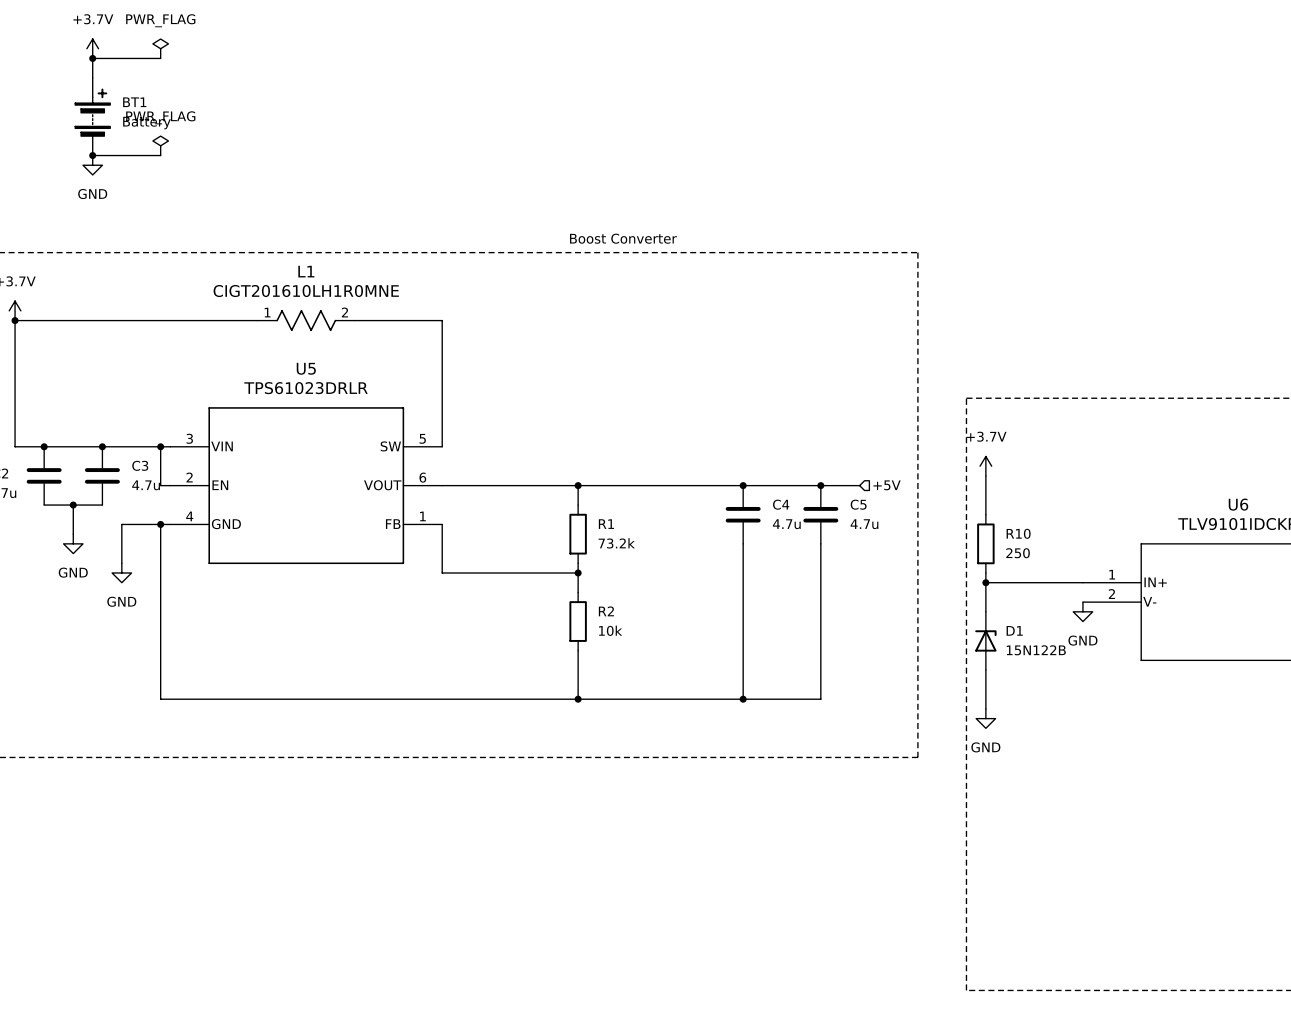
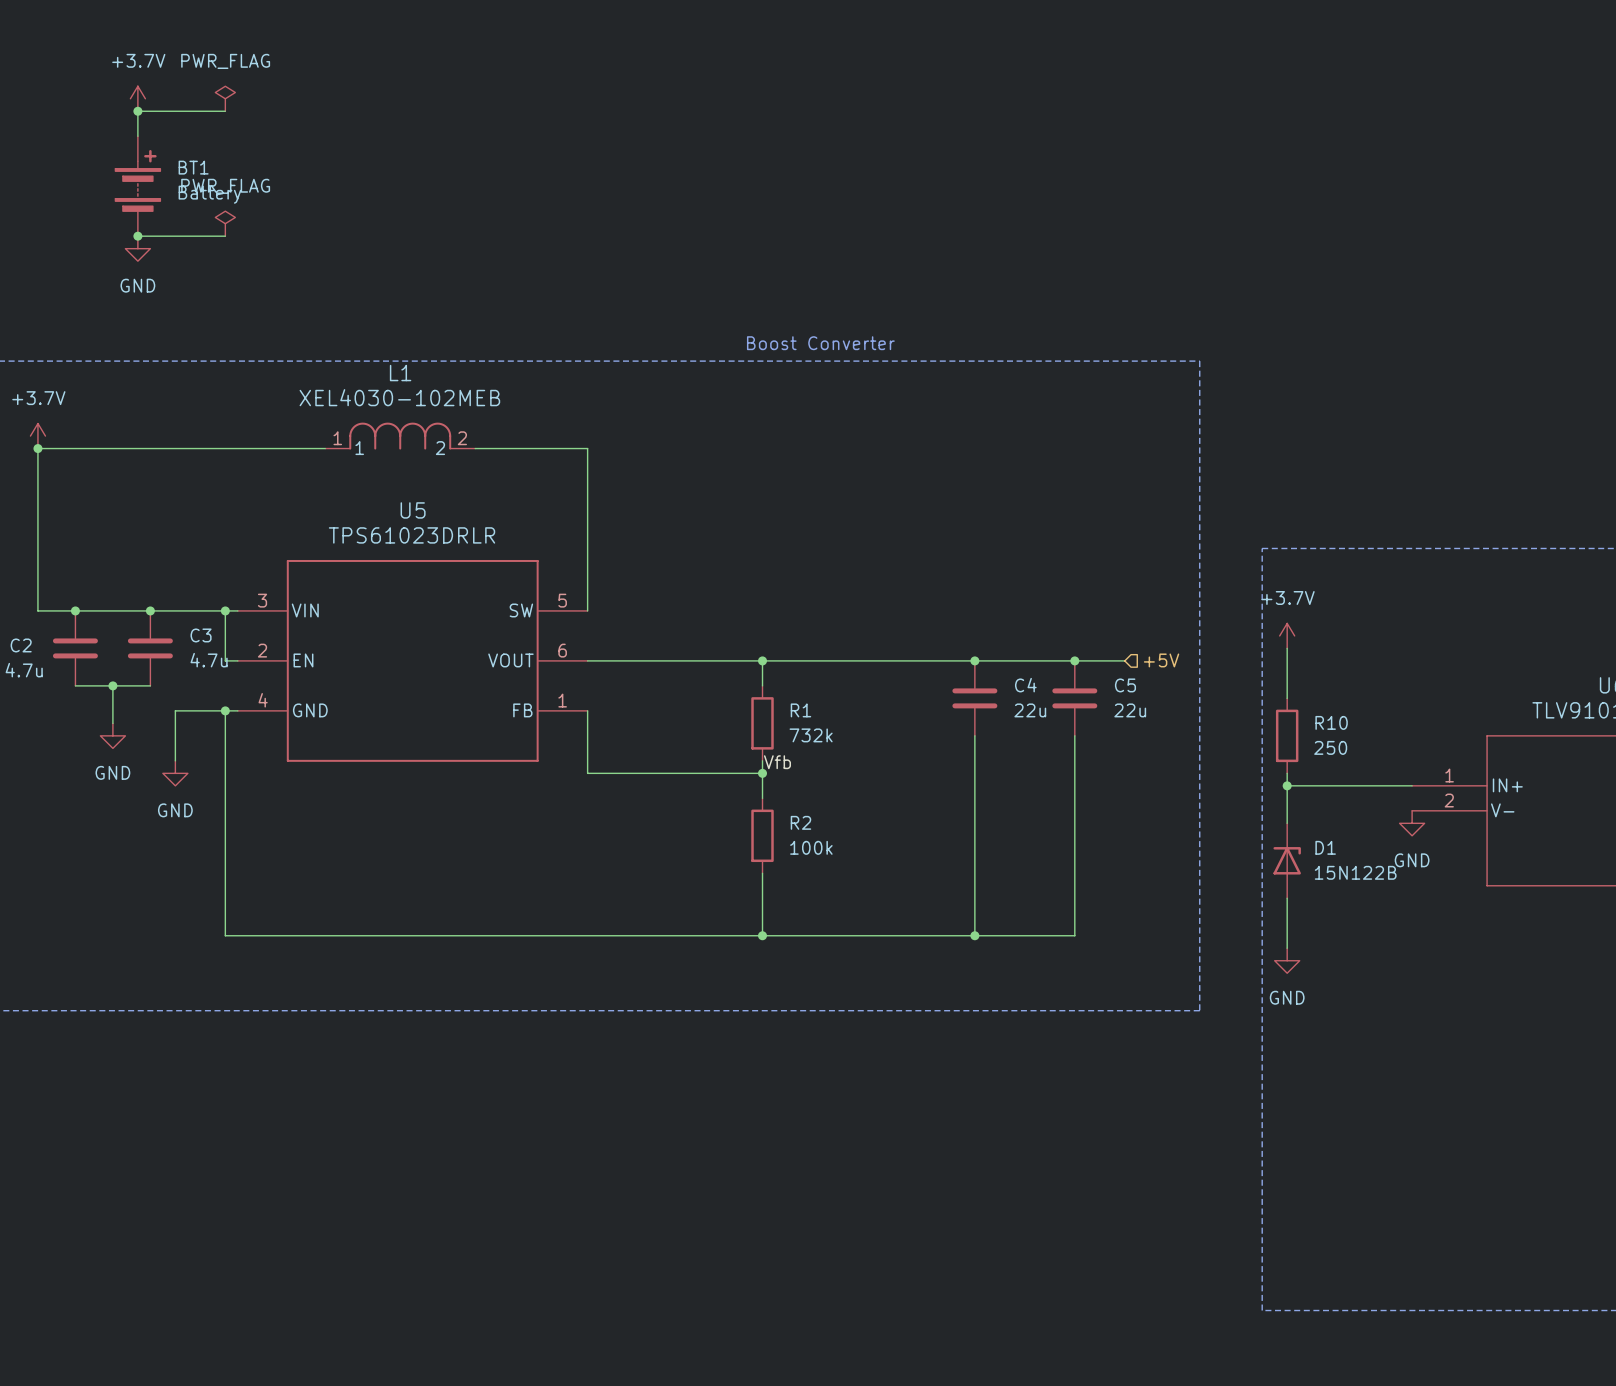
L1 value: CIGT201610LH1R0MNE (306, 291) -> XEL4030-102MEB (399, 397)
L1 symbol: [257, 310, 355, 332] -> [325, 422, 476, 450]
C4 value: 4.7u (786, 524) -> 22u (1030, 710)
C5 value: 4.7u (864, 524) -> 22u (1130, 710)
R1 value: 73.2k (616, 543) -> 732k (811, 735)
label: none -> Vfb (777, 762)
R2 value: 10k (610, 630) -> 100k (811, 847)

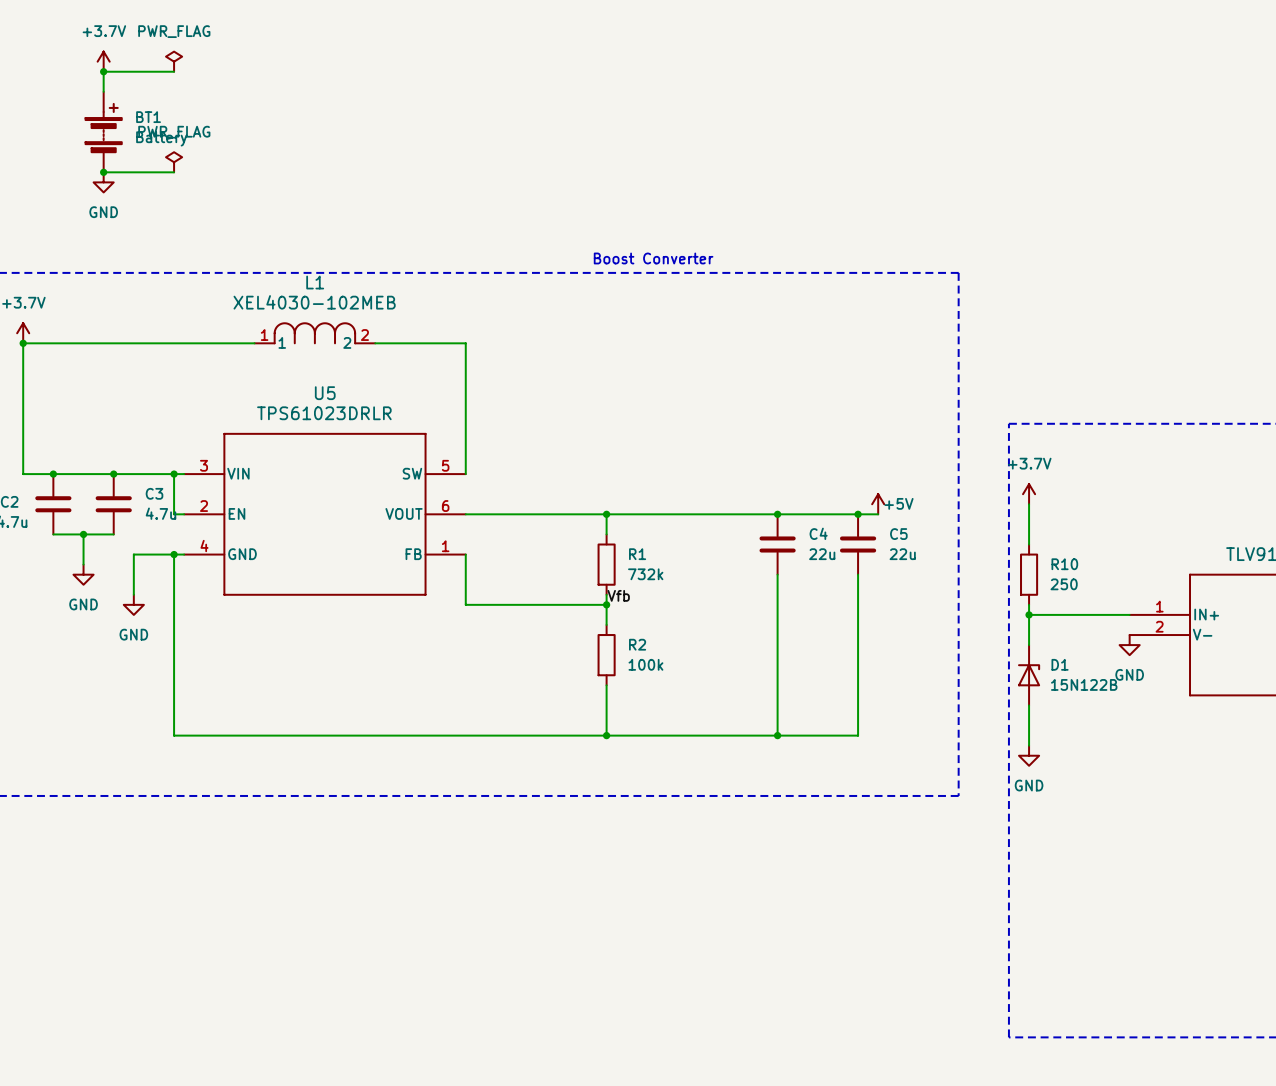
power symbol: none -> +5V (878, 504)
wire: (1099, 660) (1124, 660) -> none
hierarchical label: +5V (1161, 660) -> none

